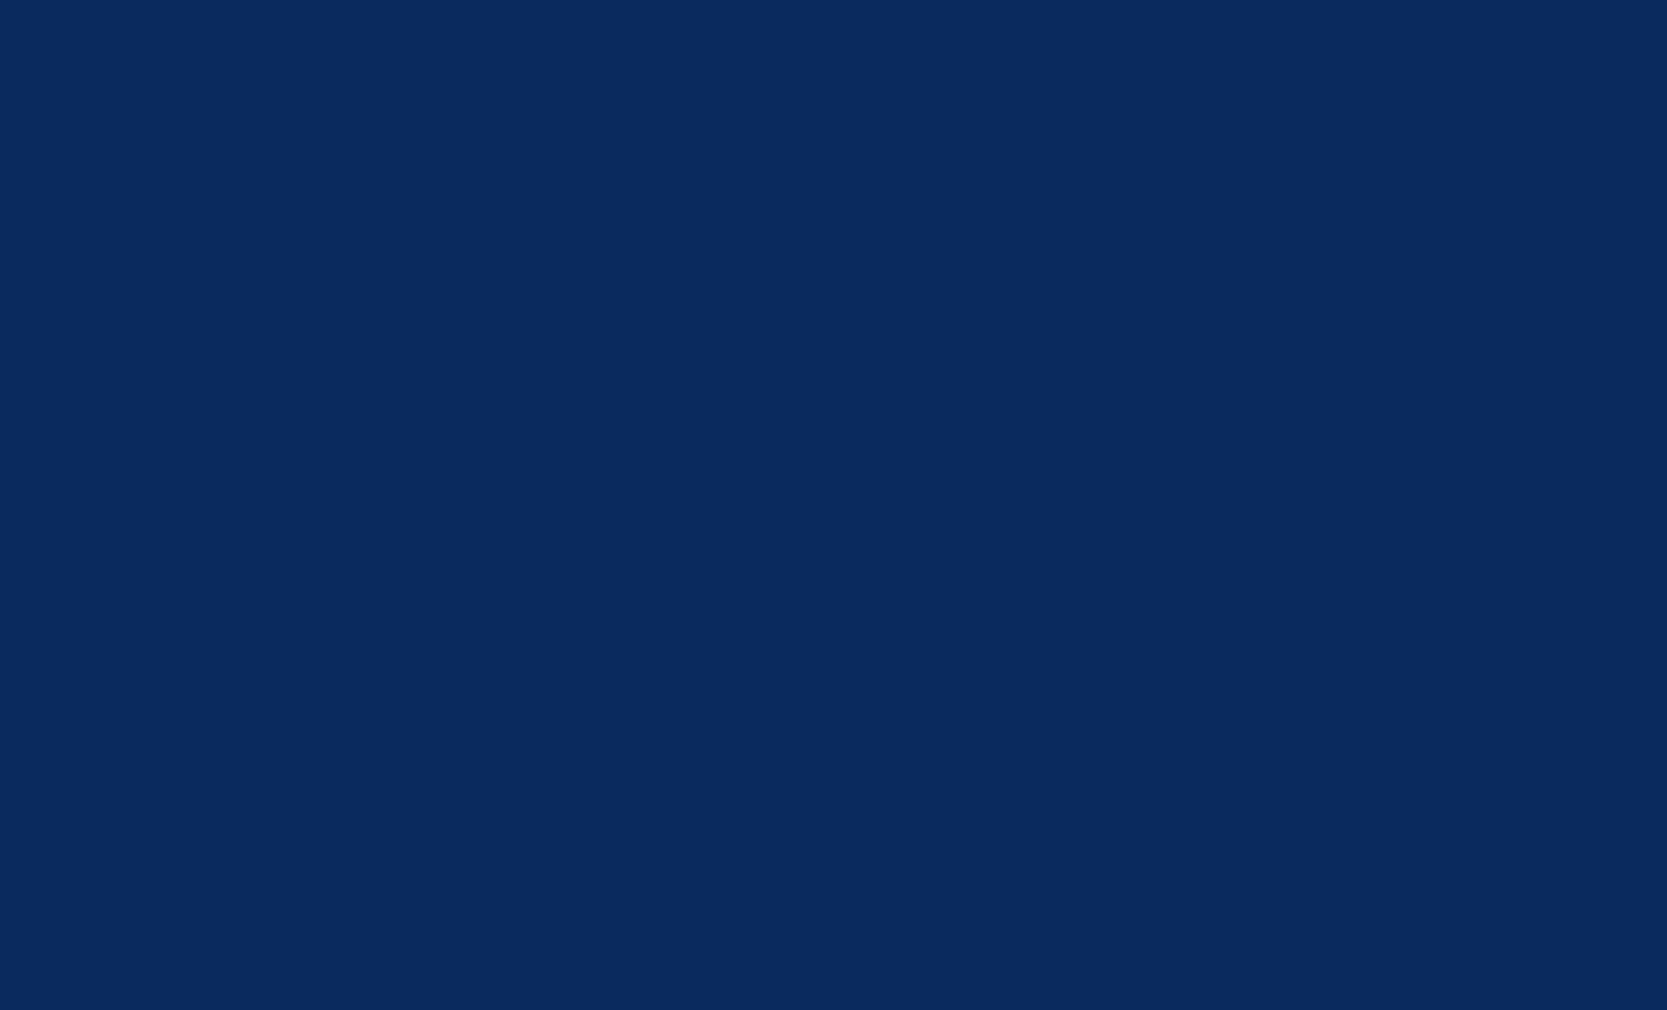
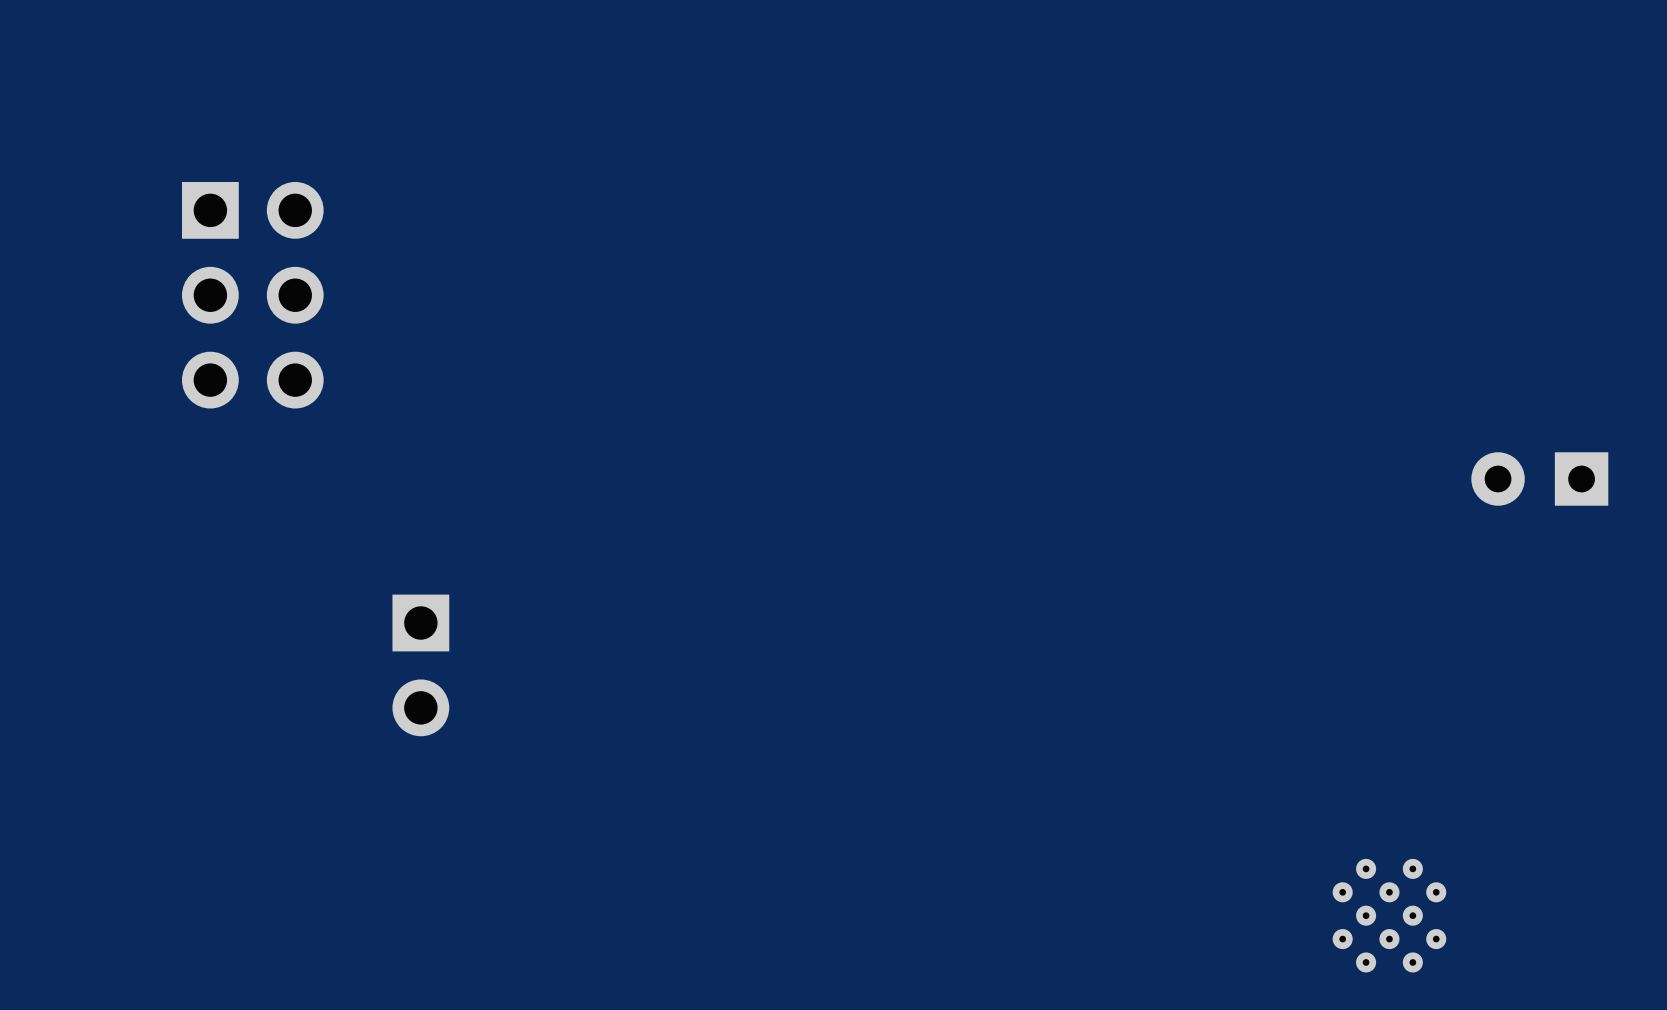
part: none -> (252, 295)
part: none -> (1539, 479)
part: none -> (420, 665)
part: none -> (1389, 915)

